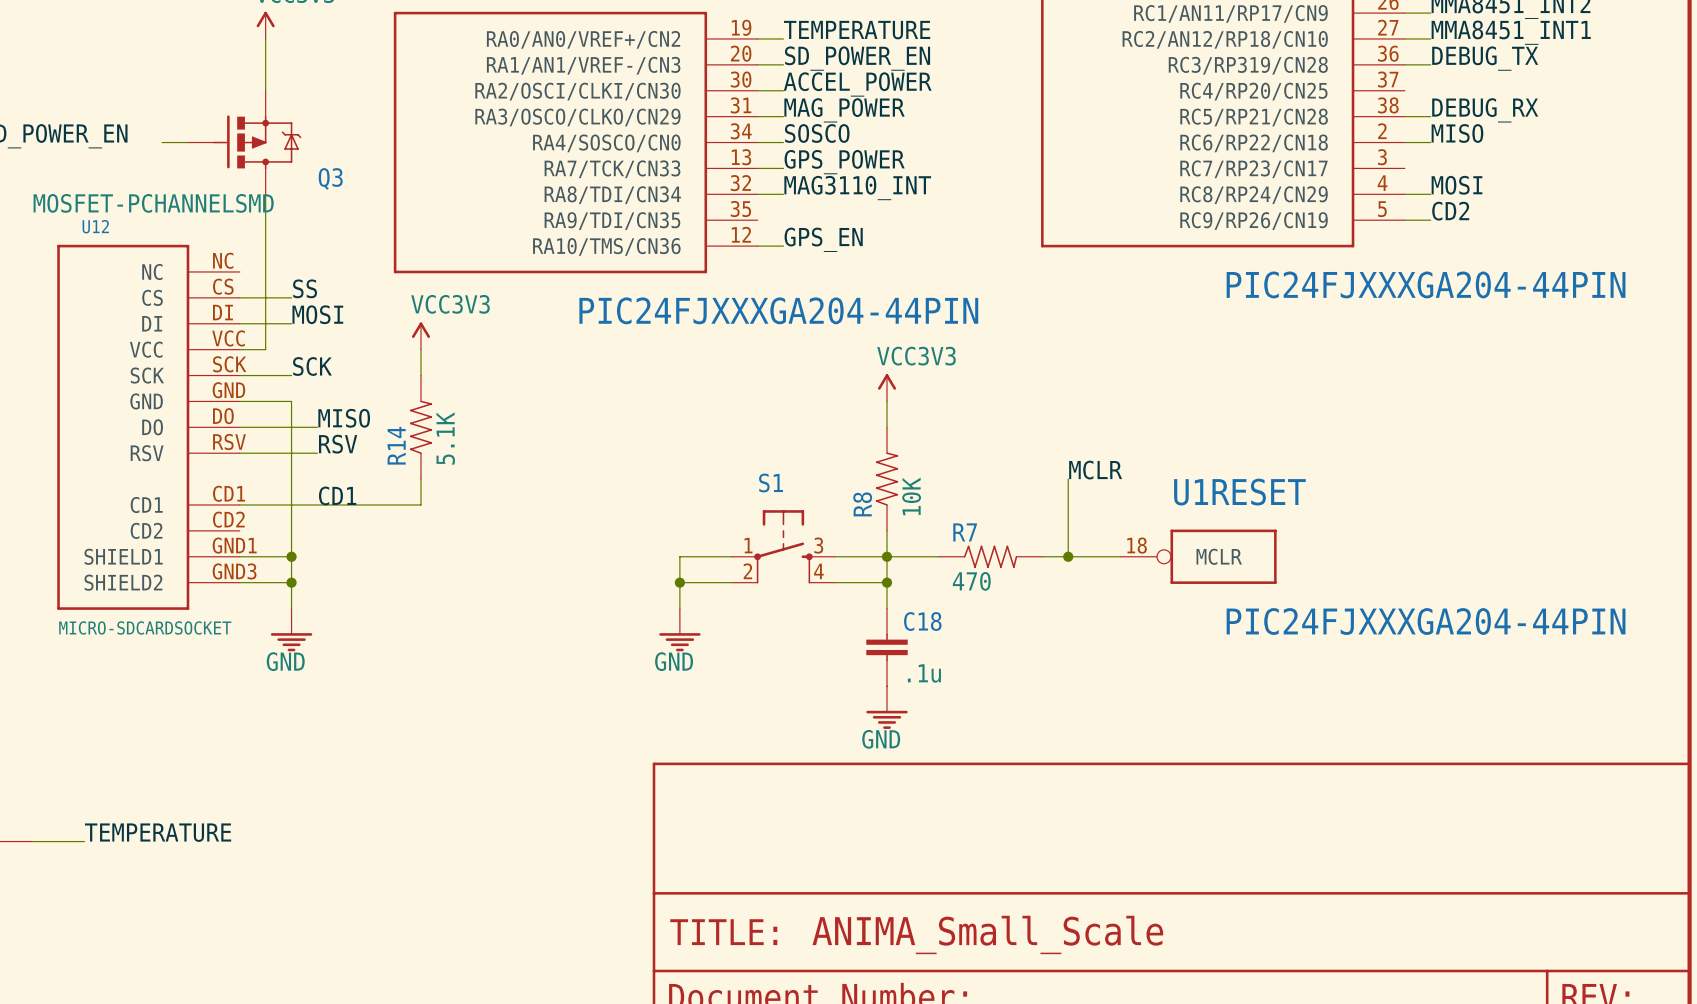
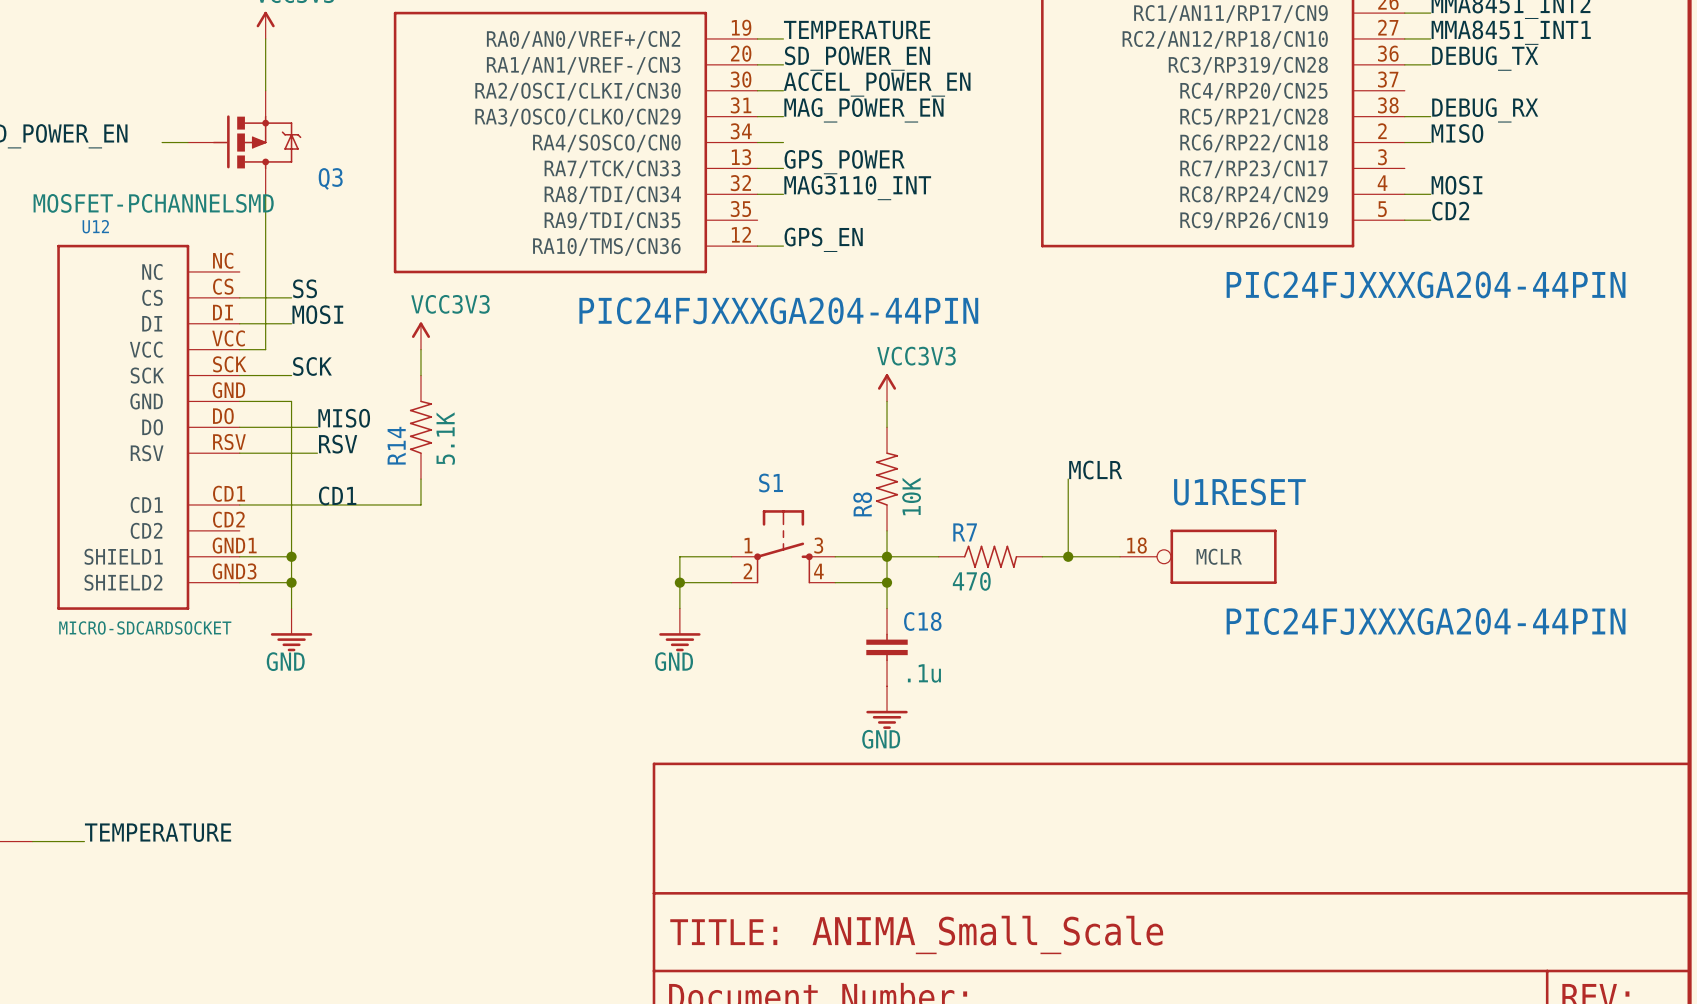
label: ACCEL_POWER (857, 84) -> ACCEL_POWER_EN (877, 84)
label: MAG_POWER (844, 110) -> MAG_POWER_EN (863, 110)
label: SOSCO (817, 133) -> none

